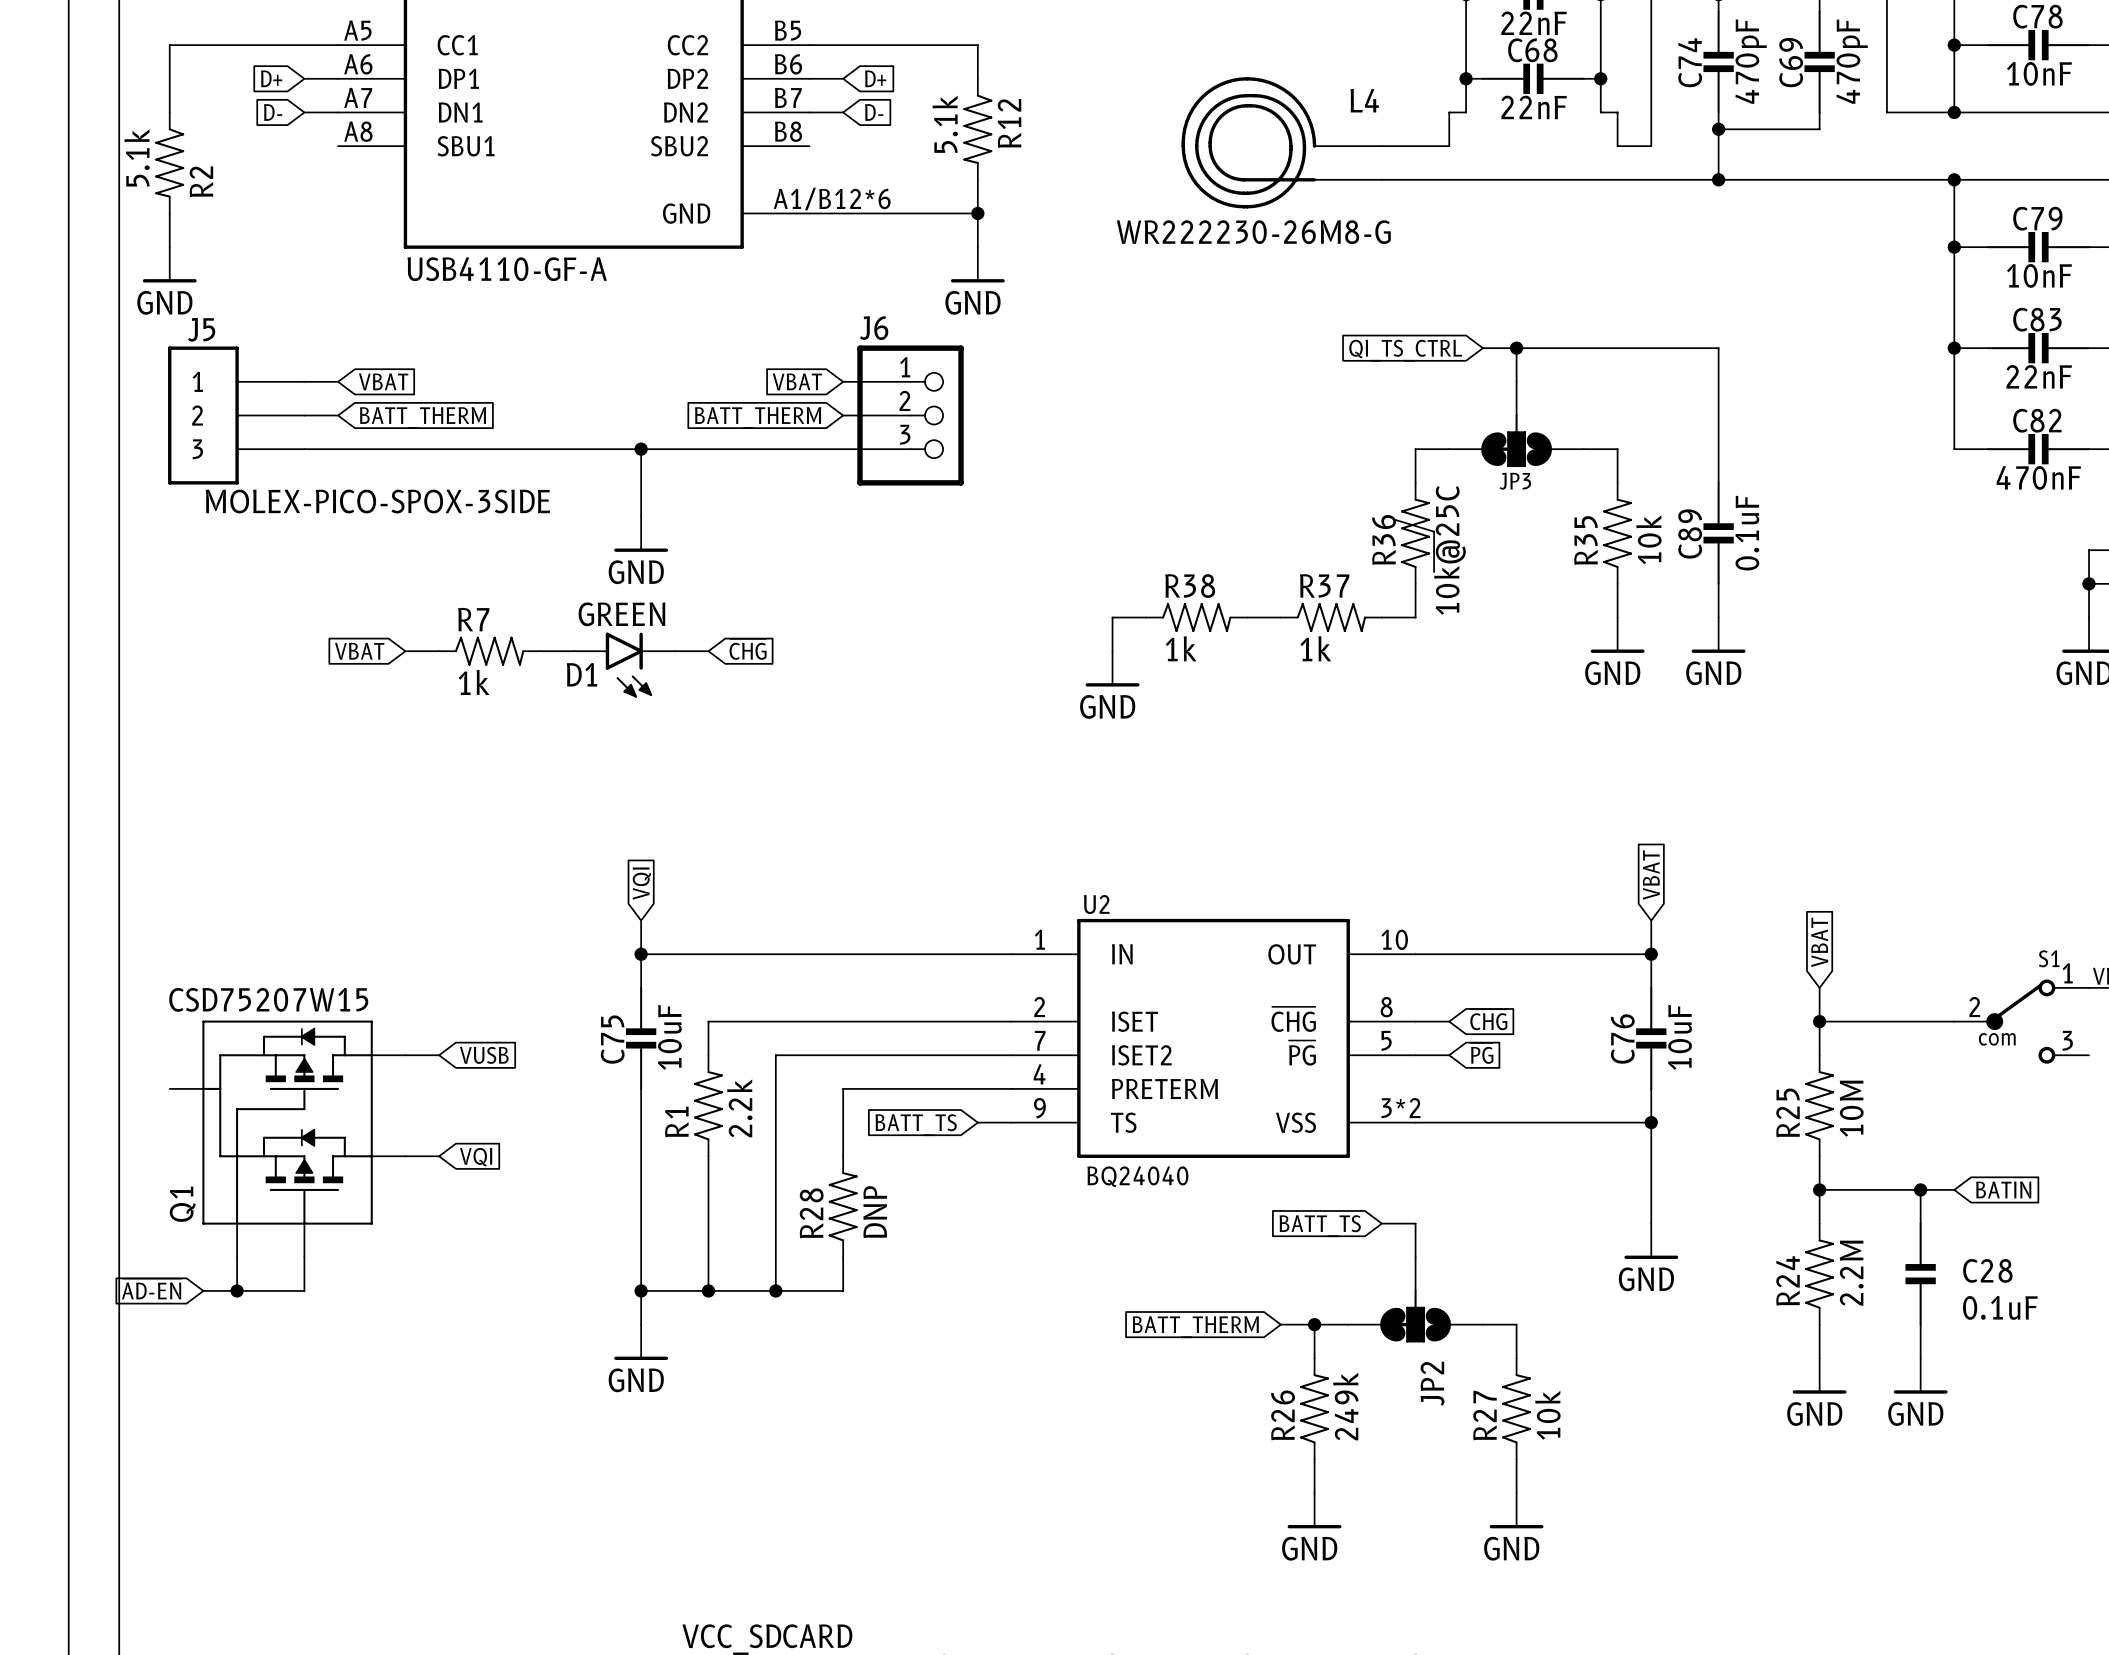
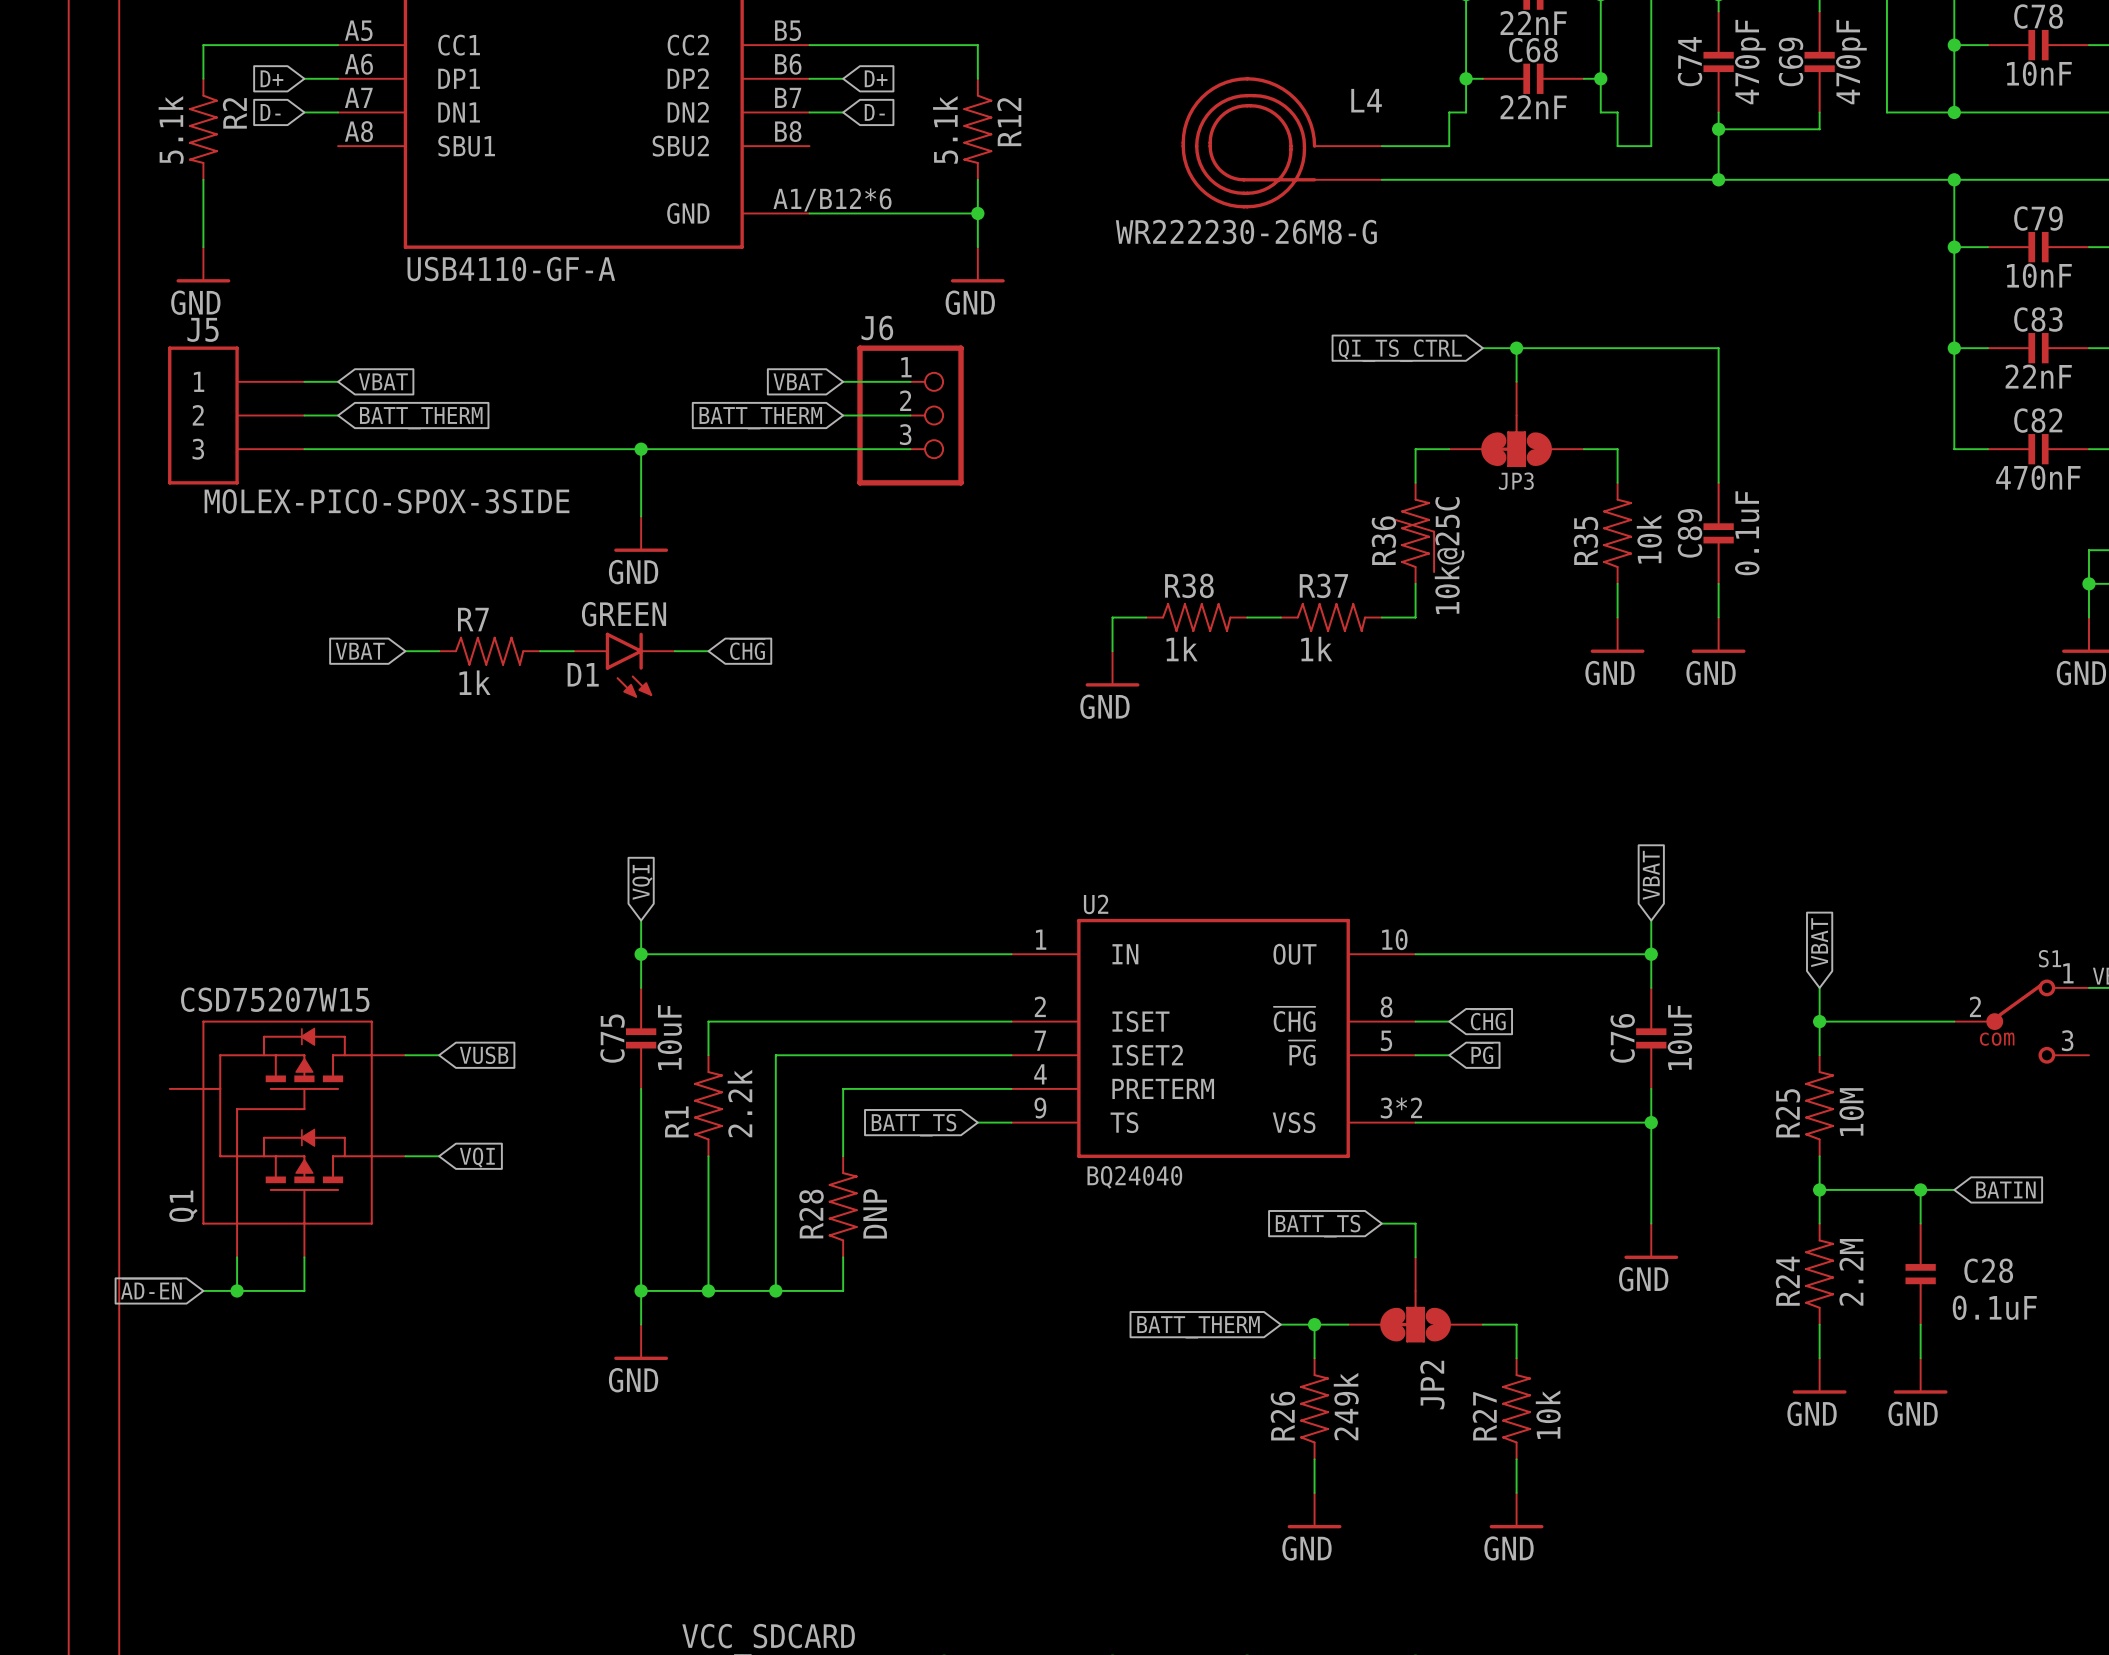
wire: (203, 45) (169, 45) (169, 112) -> (203, 45) (203, 78)
R2 position: (169, 162) -> (203, 129)
wire: none -> (203, 179) (203, 247)
R2 name position: R2 (201, 181) -> R2 (234, 113)
wire: (169, 213) (169, 247) -> none
power symbol position: GND (169, 264) -> GND (203, 264)

